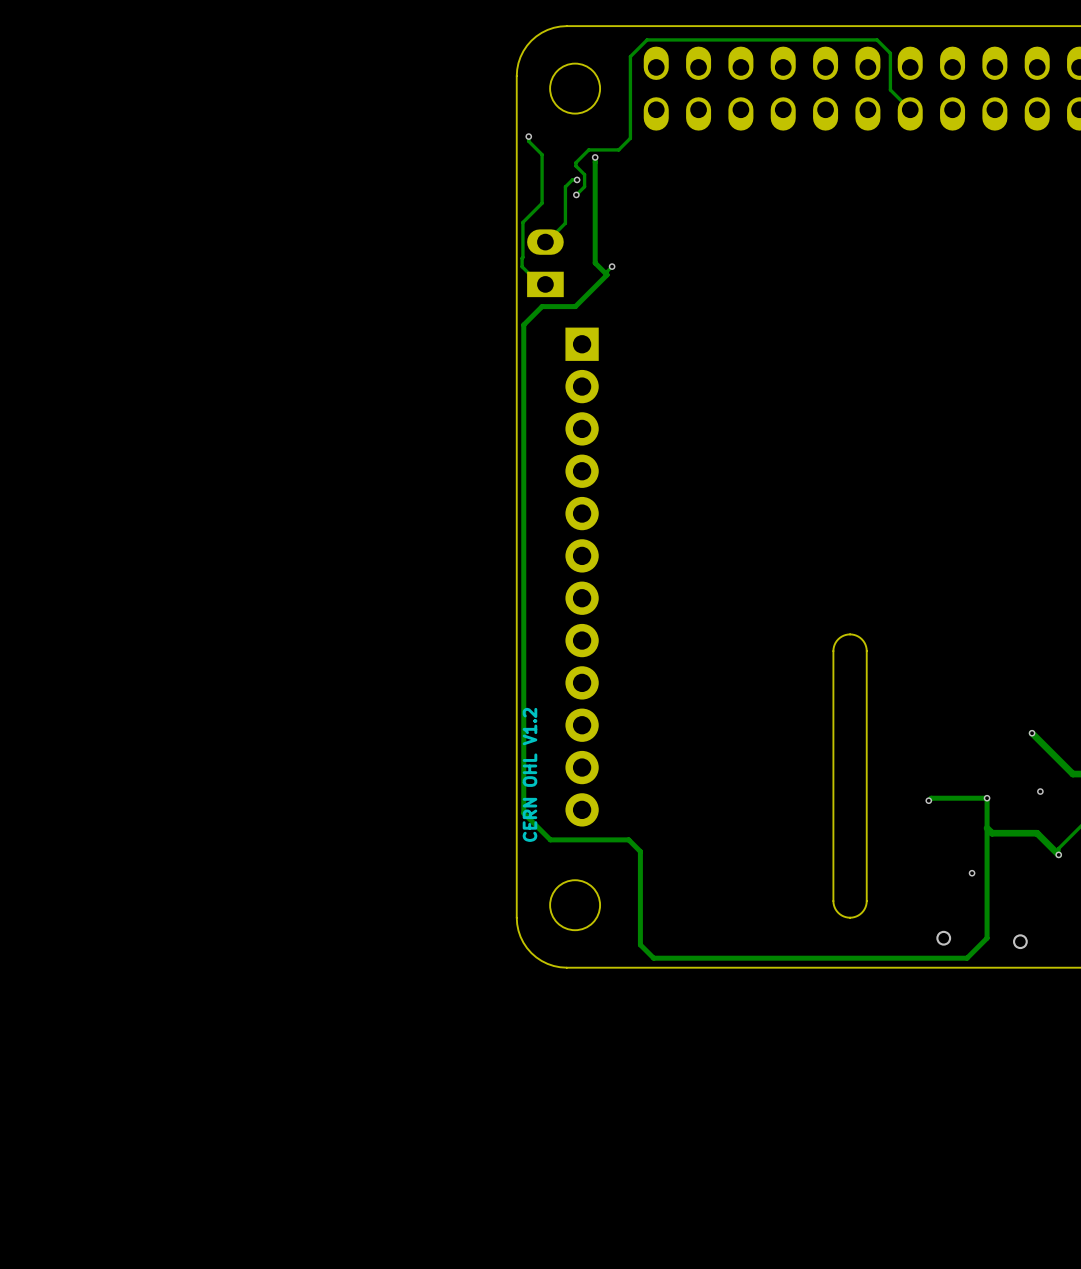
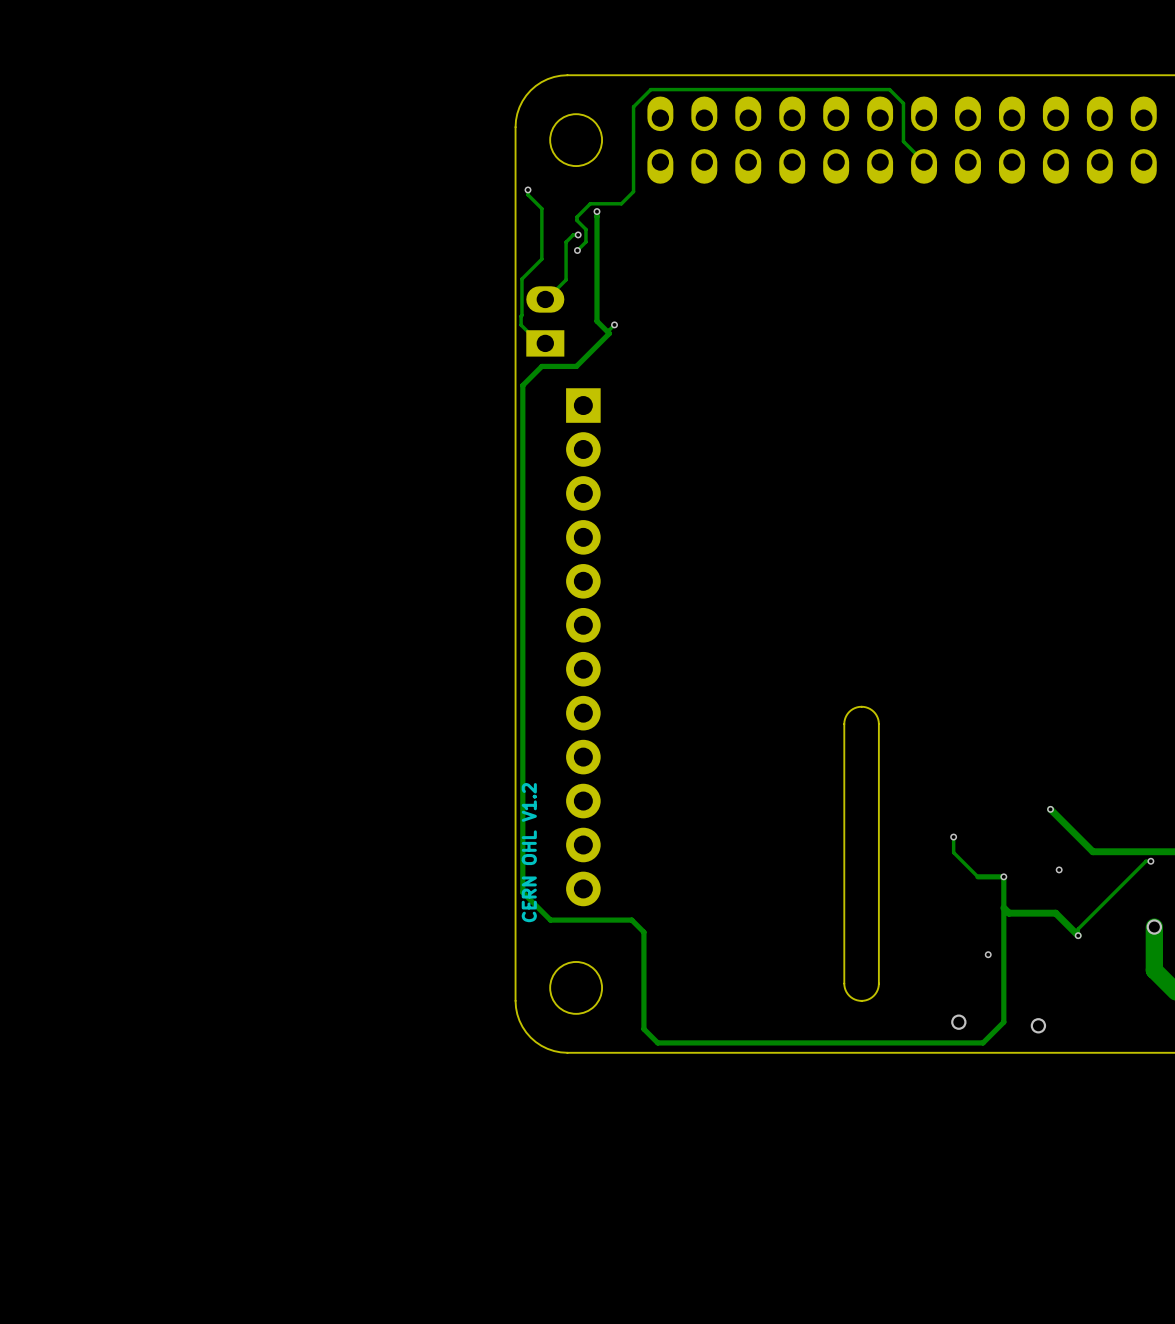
track: (962, 798) (931, 798) (928, 800) -> (977, 876) (953, 852) (953, 837)
via position: (928, 800) -> (953, 837)

